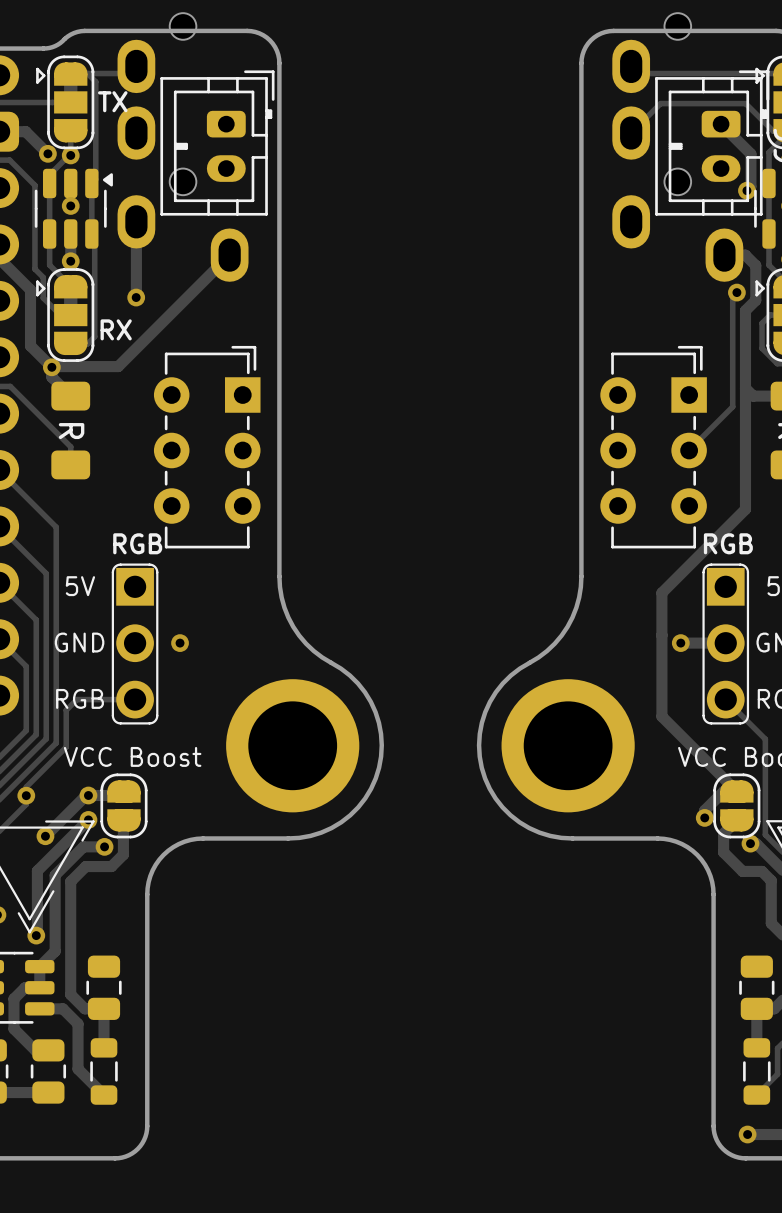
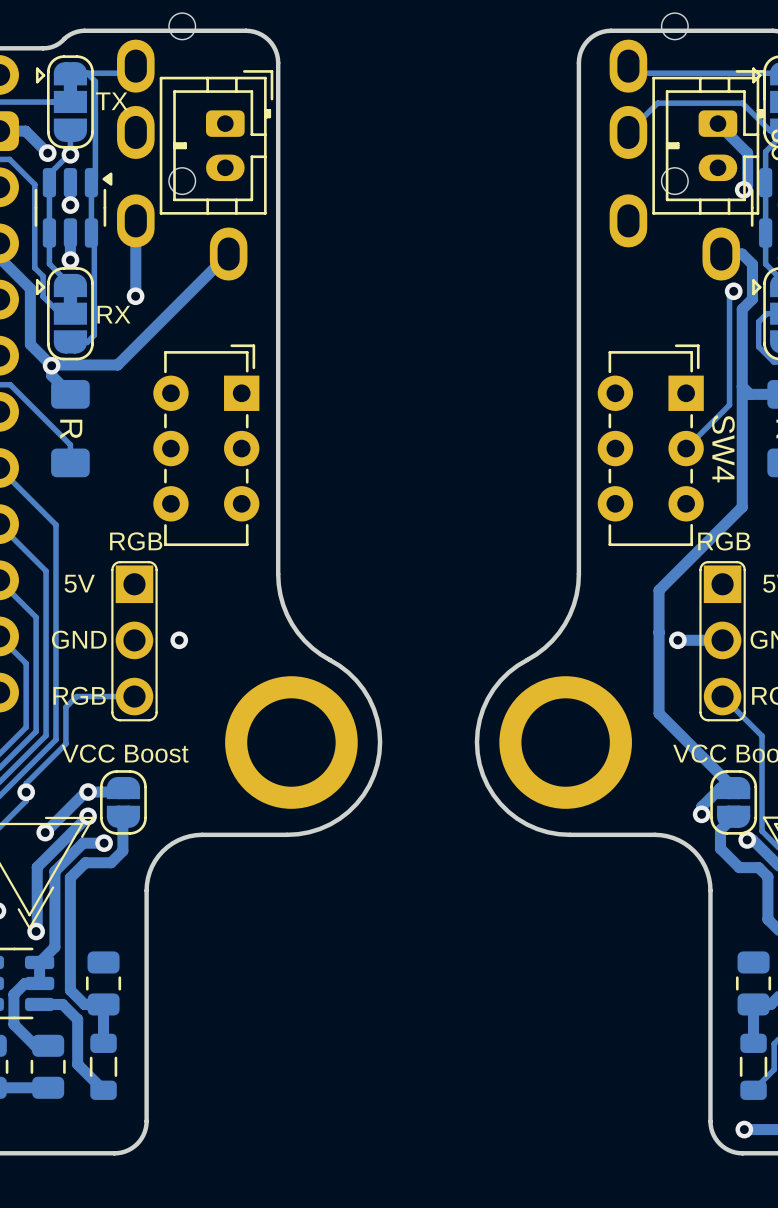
text position: RX (116, 329) -> RX (114, 314)
SW4 name: none -> SW4 (723, 448)

